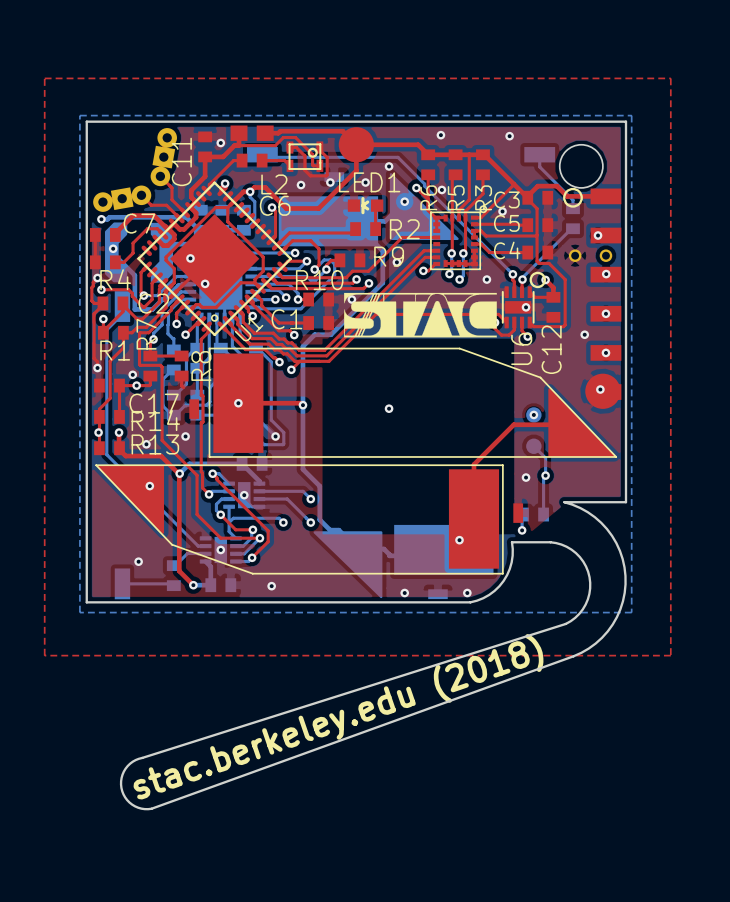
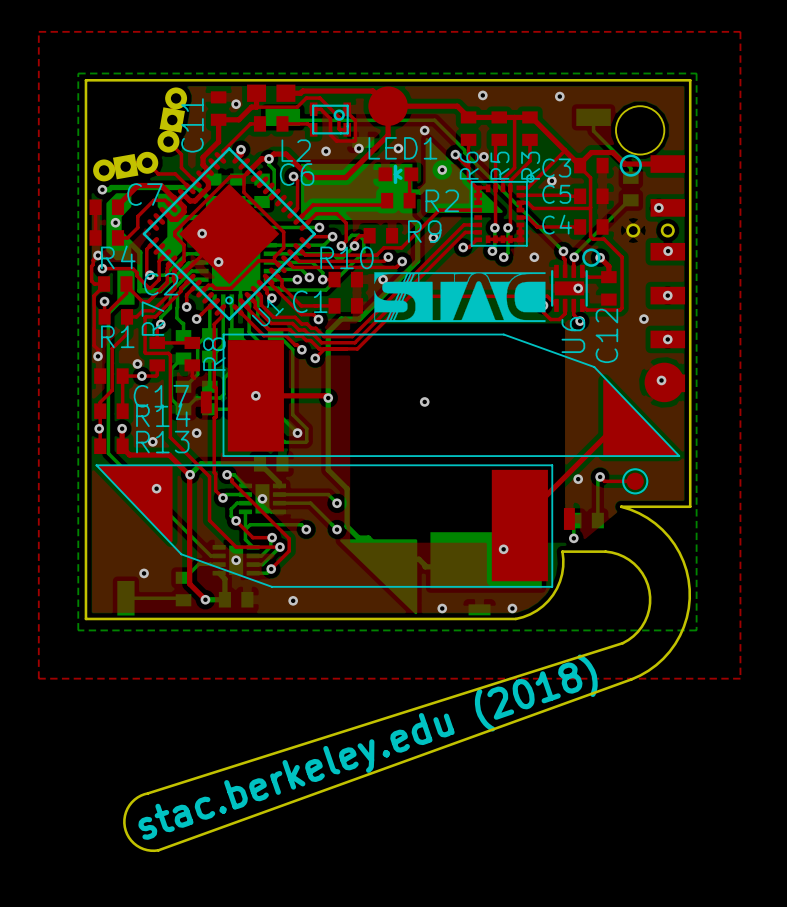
part side: bottom (533, 414) -> top (635, 481)
via: (533, 414) -> none
top track: (566, 432) (558, 424) (513, 424) (473, 464) (473, 515) -> (623, 428) (613, 428) (519, 522)
bottom track: (533, 446) (545, 458) (545, 475) -> none
part: (533, 446) -> none
top track: none -> (600, 476) (604, 481) (635, 481)

